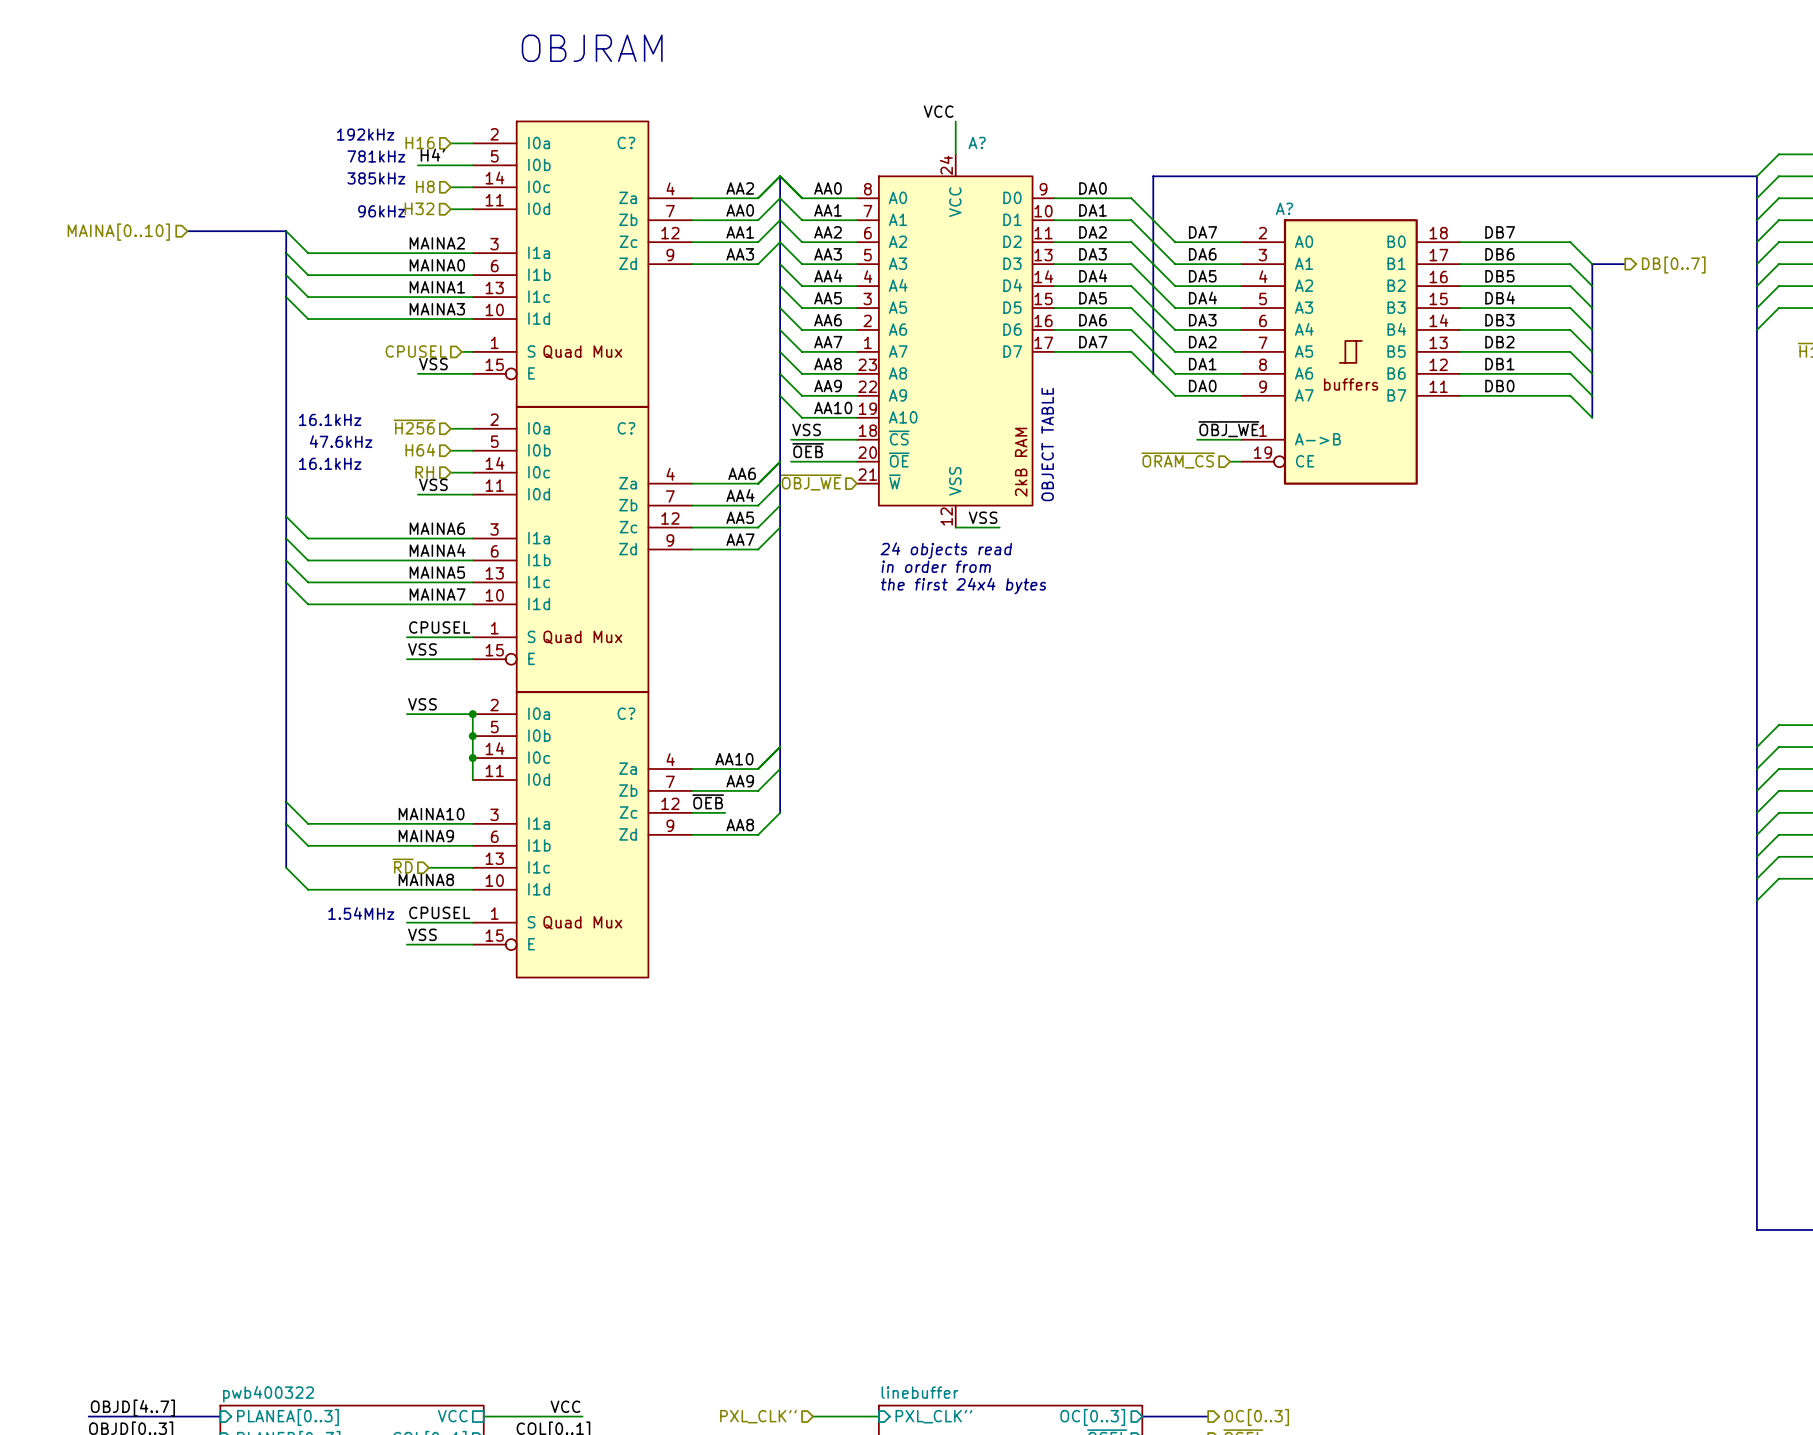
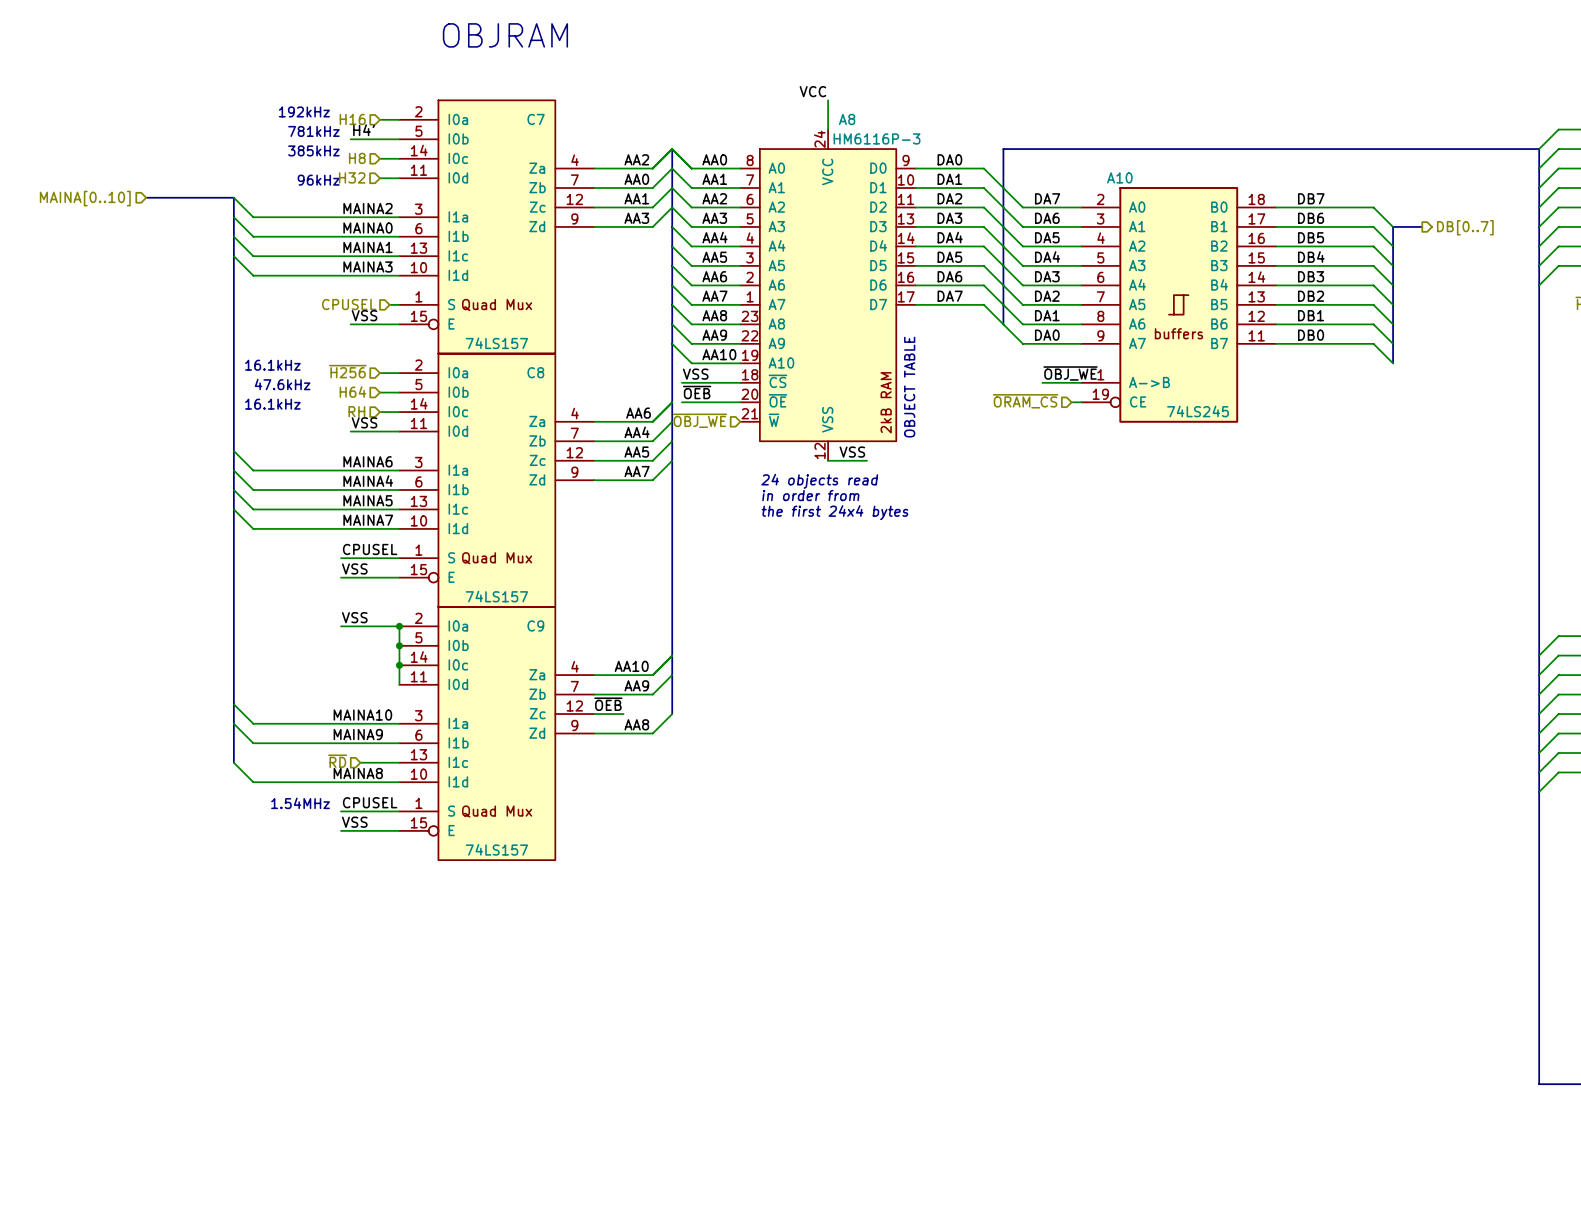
C? name: C? (626, 142) -> C7 (536, 119)
A? name: A? (977, 142) -> A8 (847, 119)
A? value: none -> HM6116P-3 (877, 138)
A? name: A? (1284, 208) -> A10 (1119, 177)
C? value: none -> 74LS157 (496, 343)
C? name: C? (626, 428) -> C8 (535, 372)
A? value: none -> 74LS245 (1198, 411)
C? value: none -> 74LS157 (496, 596)
C? name: C? (626, 713) -> C9 (535, 625)
C? value: none -> 74LS157 (496, 849)

